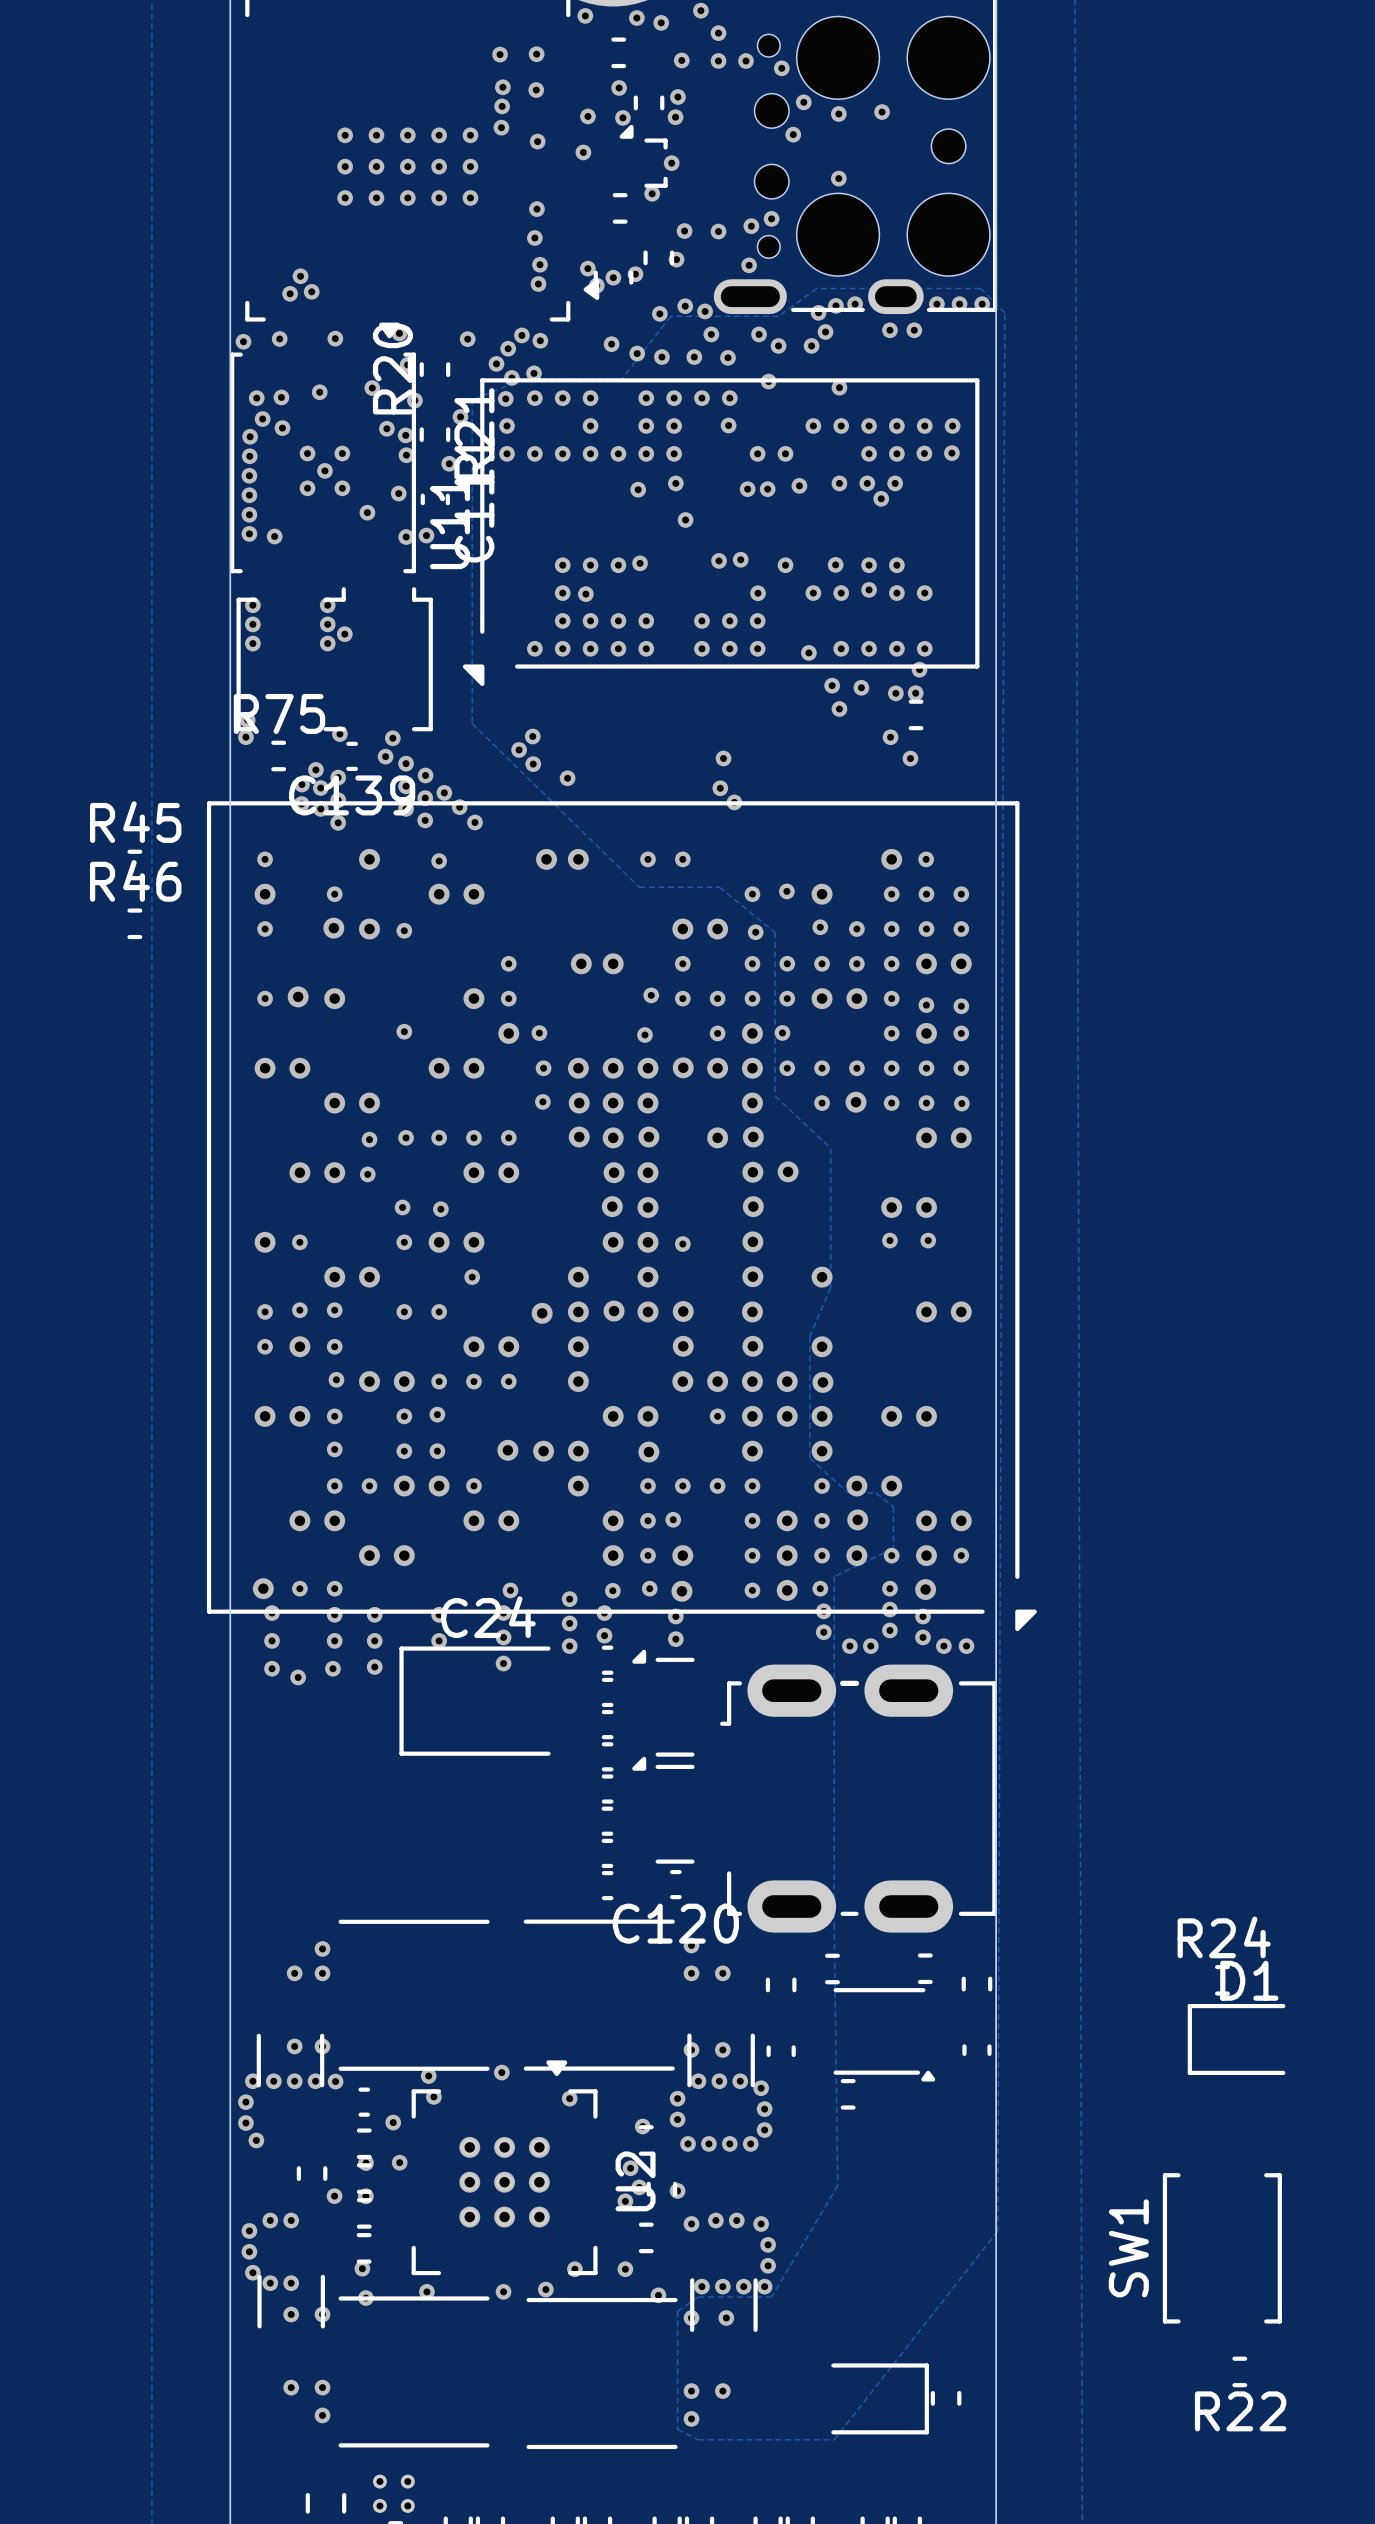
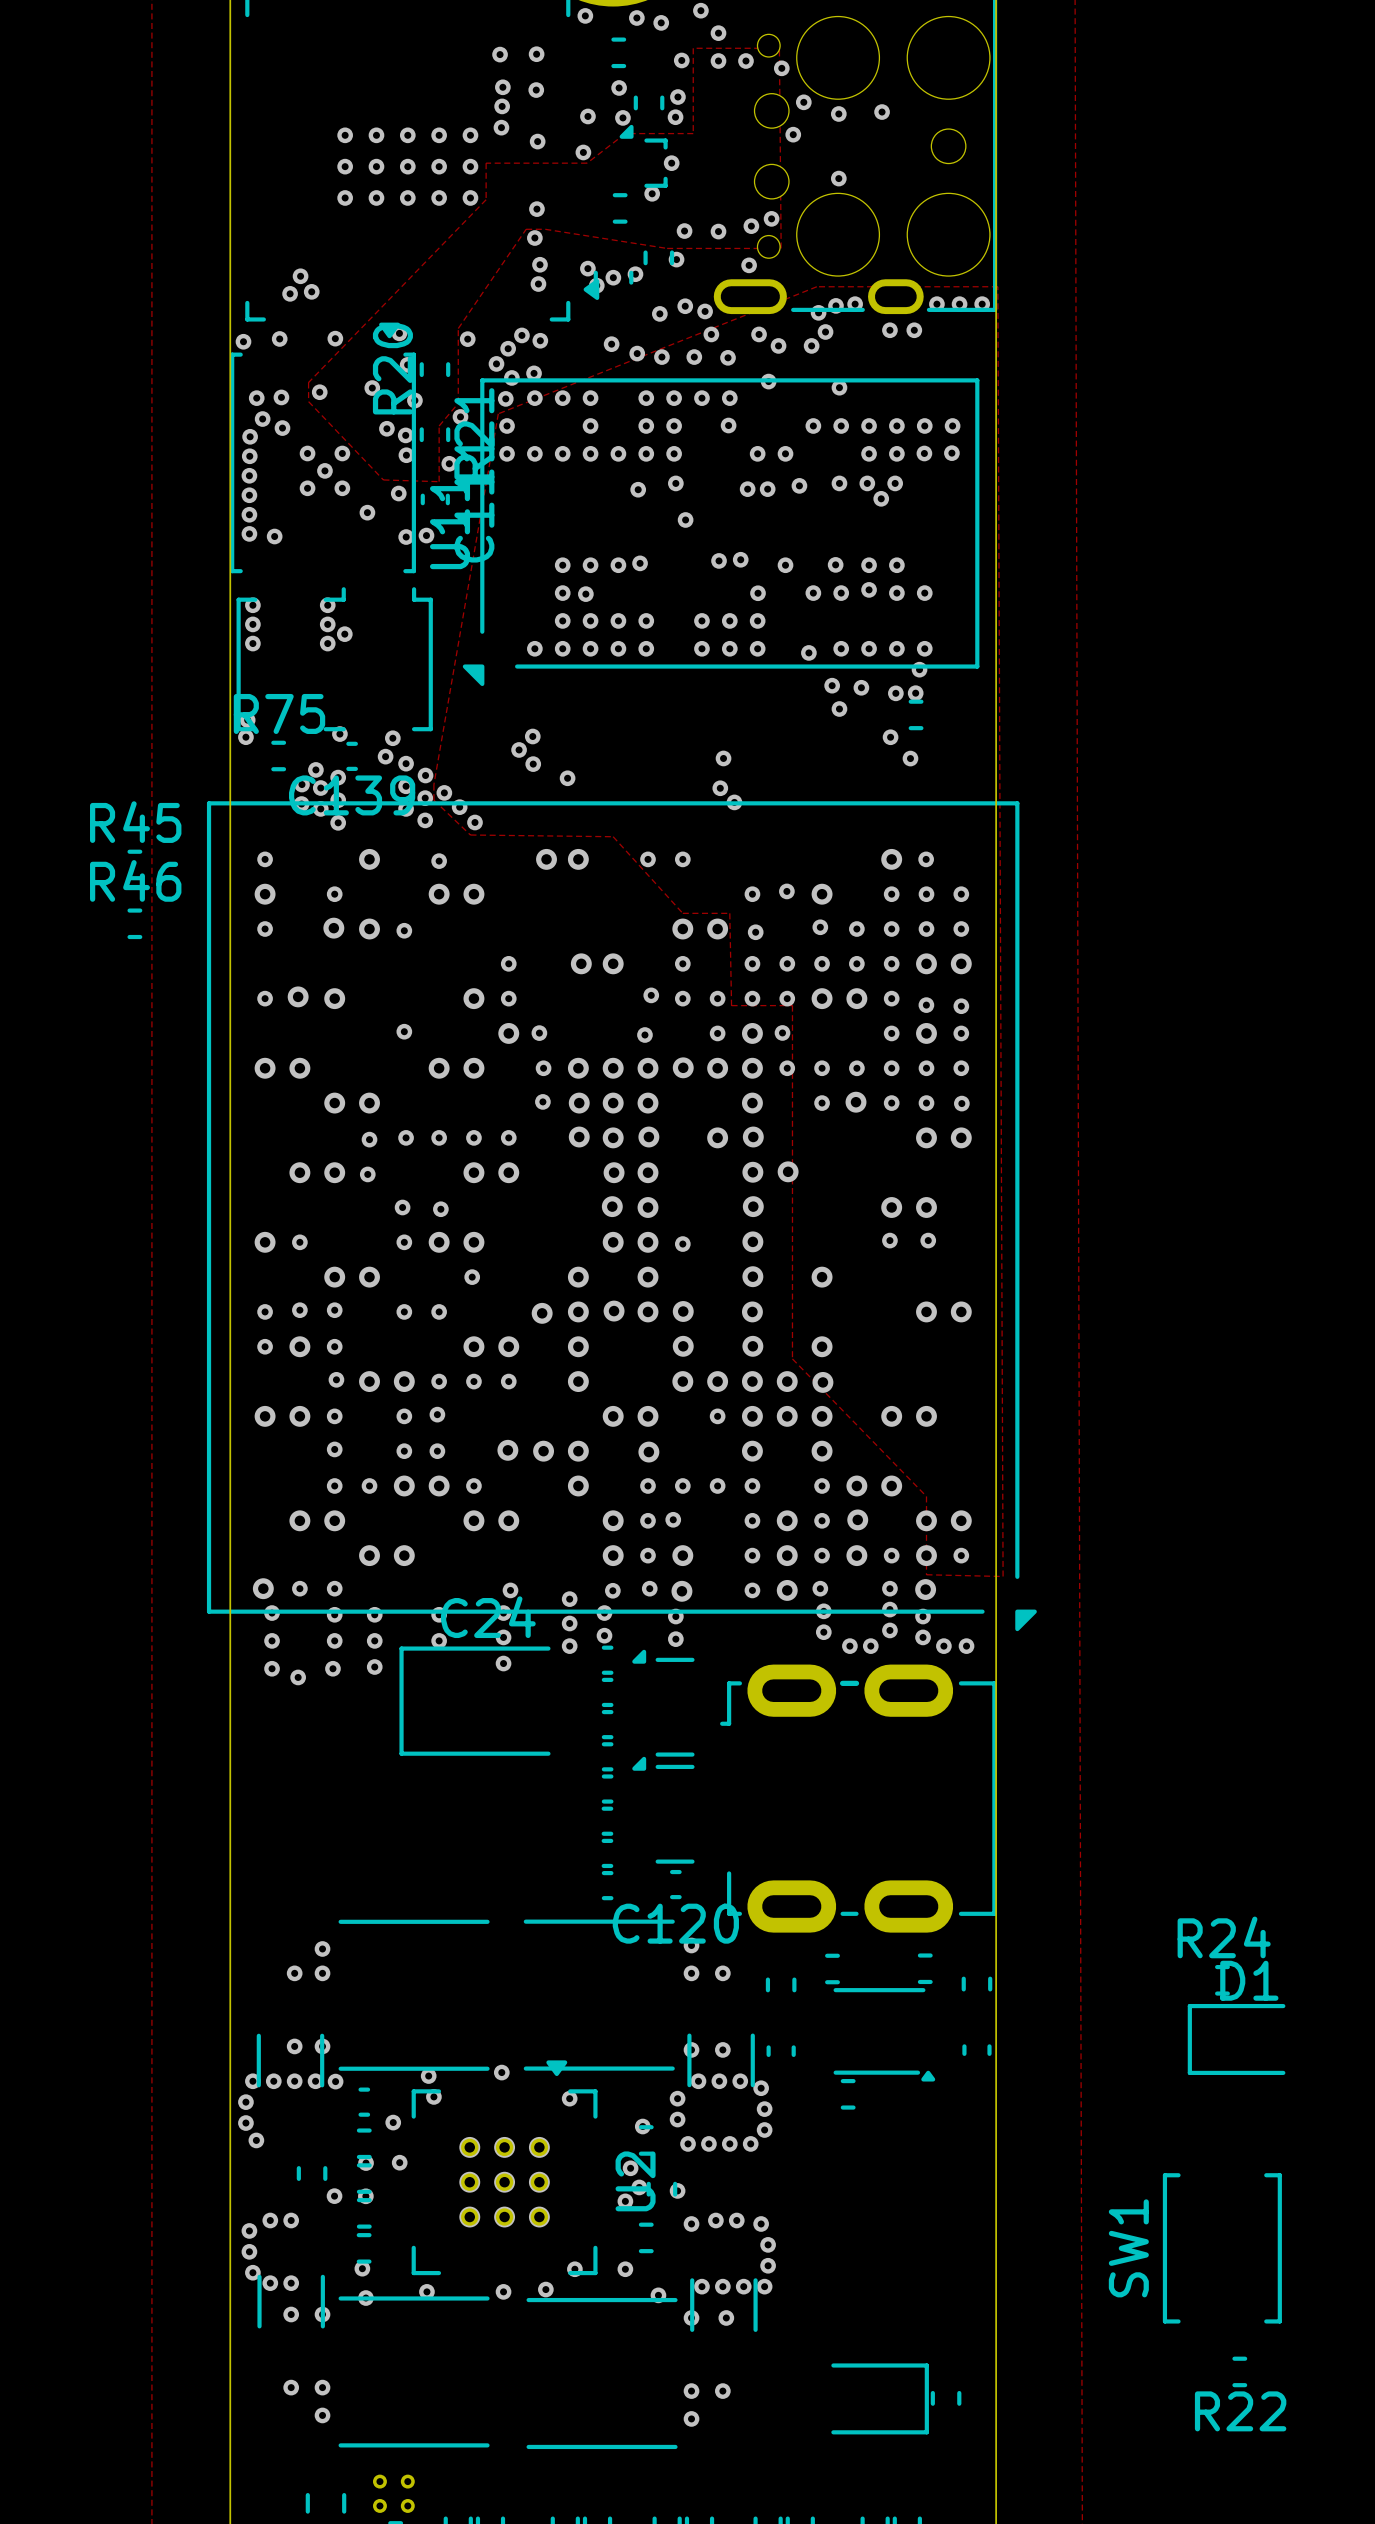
zone outline: none -> (693, 48) (779, 48) (781, 248) (667, 248) (545, 229) (526, 229) (458, 328) (458, 403) (439, 425) (439, 481) (383, 479) (308, 401) (308, 382) (486, 199) (486, 163) (587, 163) (625, 133) (693, 133) (693, 48)
zone outline: (816, 288) (980, 288) (1004, 312) (997, 2230) (834, 2439) (698, 2439) (677, 2429) (677, 2311) (698, 2297) (771, 2297) (837, 2185) (834, 1924) (834, 1576) (893, 1548) (893, 1506) (876, 1492) (848, 1492) (809, 1458) (809, 1336) (830, 1287) (830, 1148) (775, 1096) (775, 932) (719, 887) (639, 887) (472, 723) (472, 399) (524, 378) (621, 378) (670, 316) (778, 316) (816, 288) -> (816, 286) (498, 413) (433, 784) (433, 800) (470, 835) (613, 836) (682, 913) (729, 913) (731, 1005) (792, 1005) (792, 1358) (926, 1496) (926, 1574) (1003, 1576) (997, 286) (816, 286)

